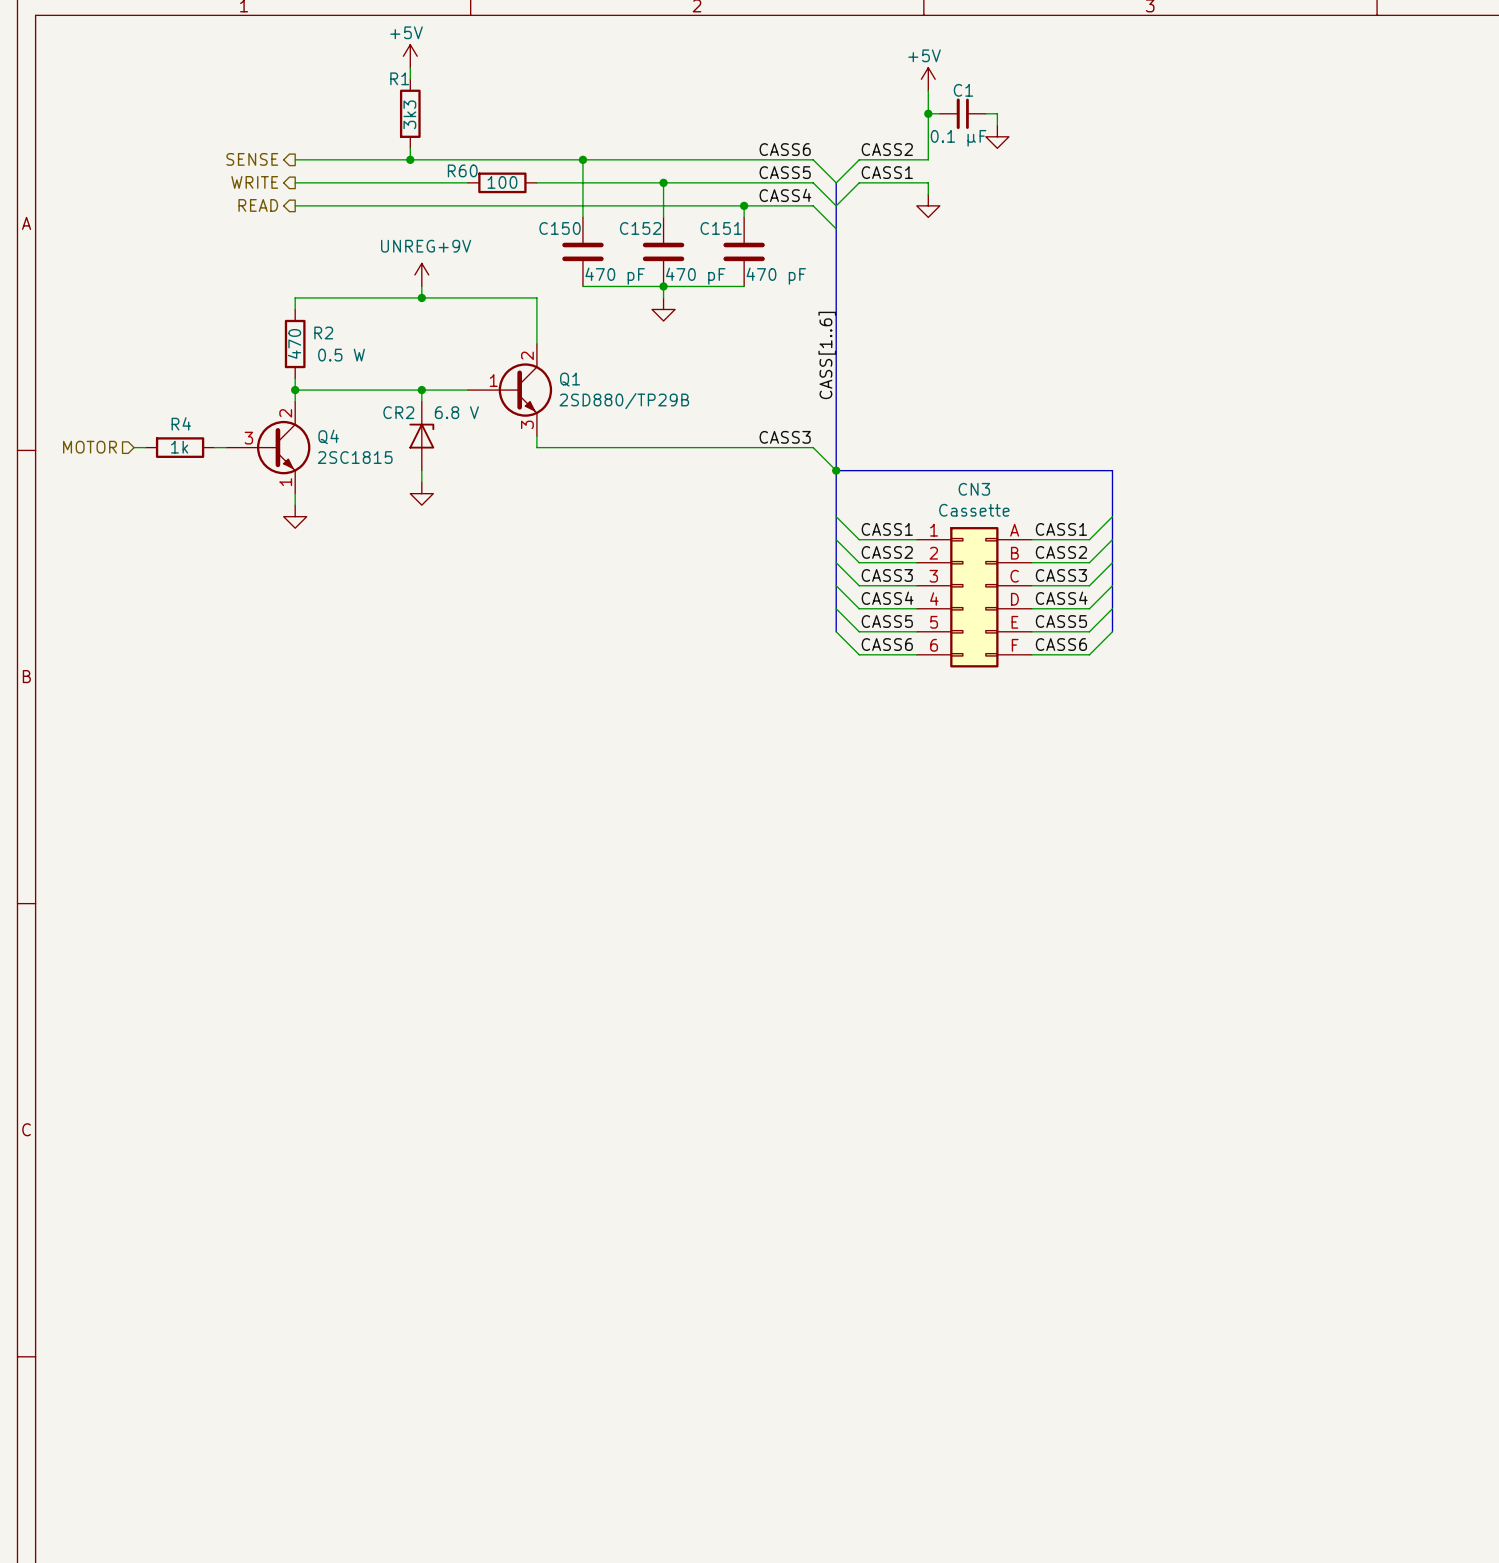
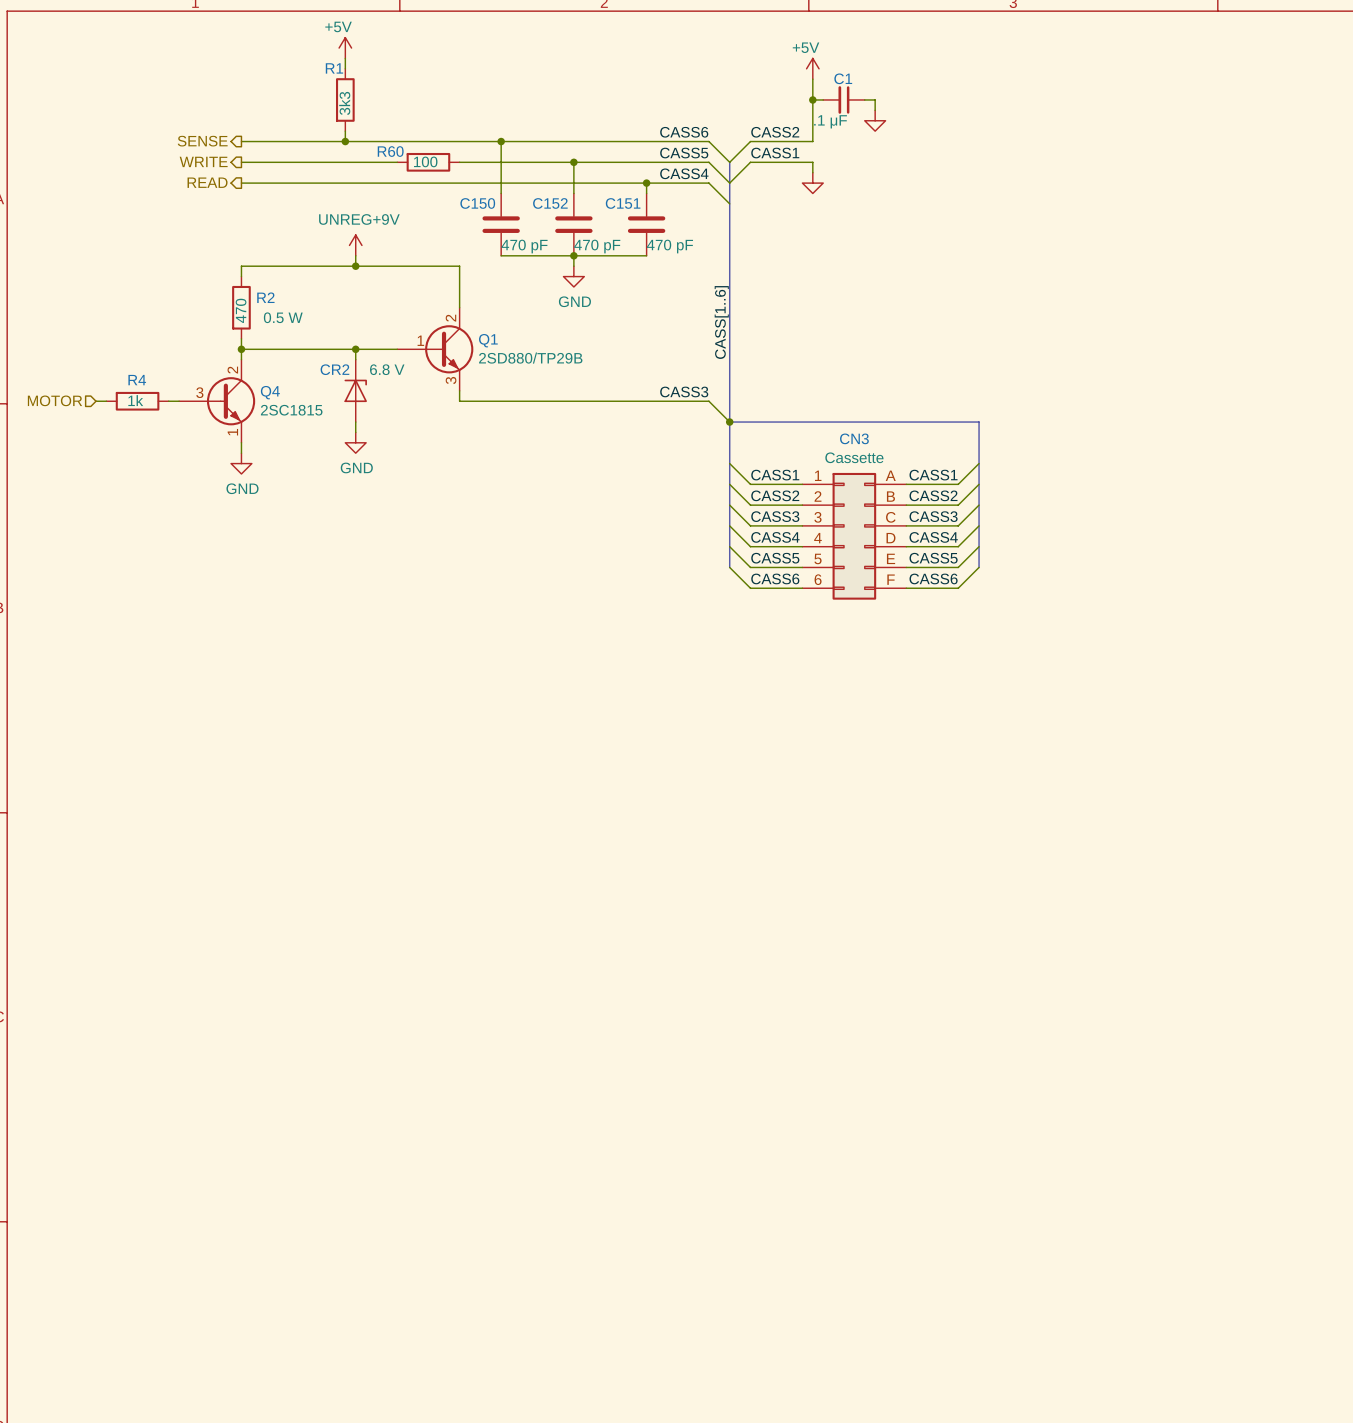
C1 value: 0.1 μF (958, 138) -> .1 μF (830, 121)
power symbol text: none -> GND (574, 301)
power symbol text: none -> GND (356, 467)
power symbol text: none -> GND (242, 488)

